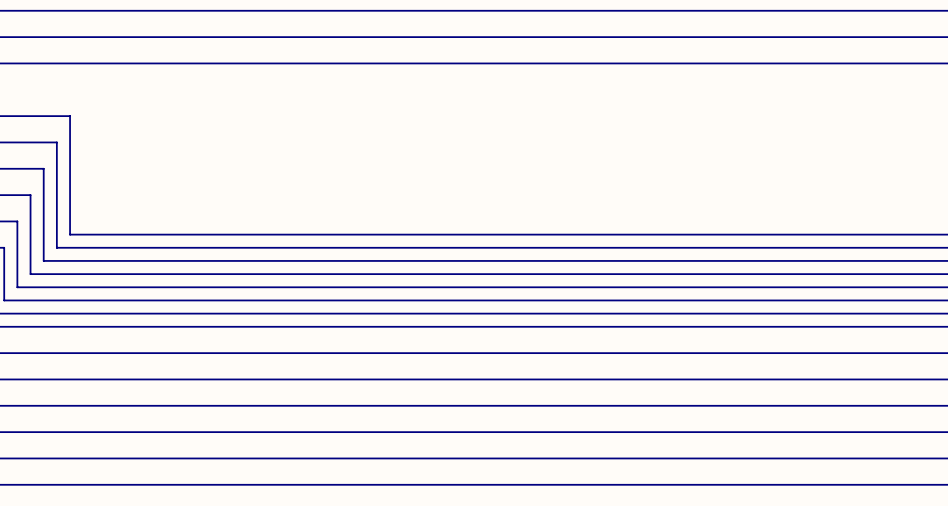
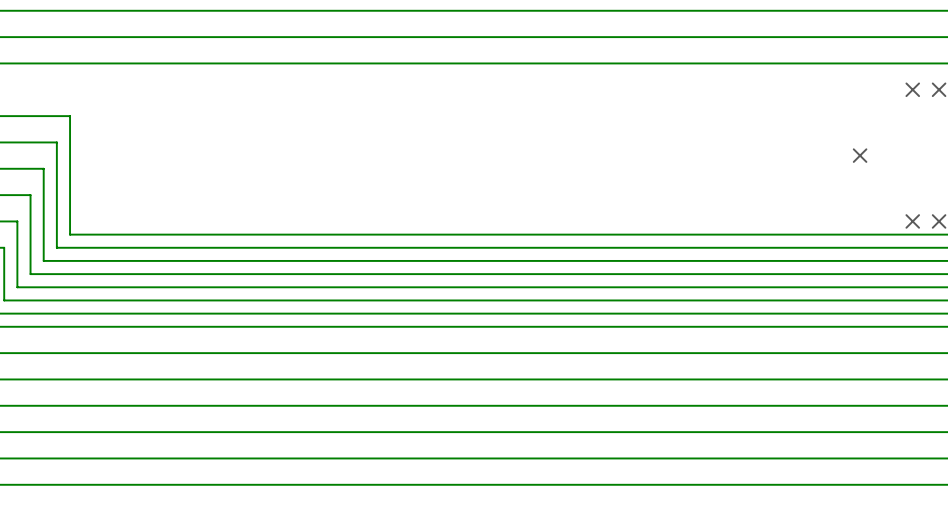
no-connect mark: none -> (912, 89)
no-connect mark: none -> (939, 89)
no-connect mark: none -> (860, 155)
no-connect mark: none -> (912, 221)
no-connect mark: none -> (939, 221)

